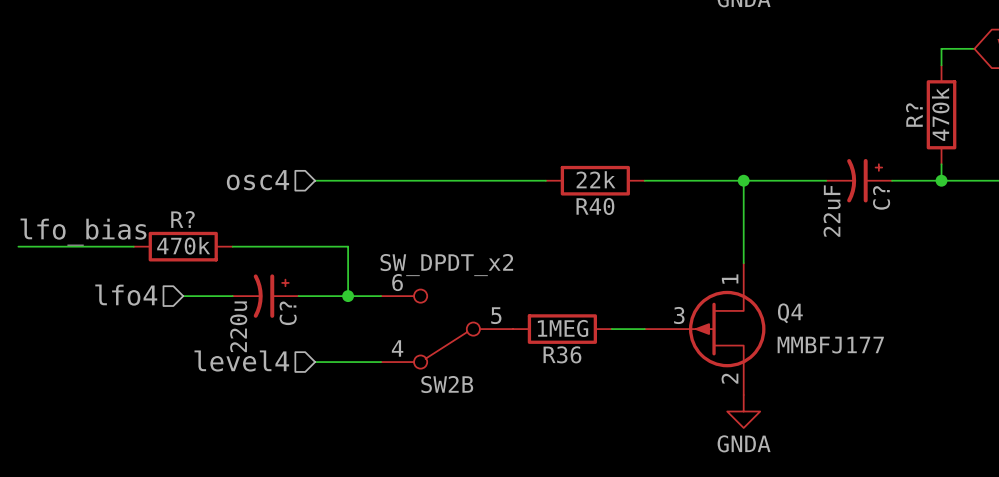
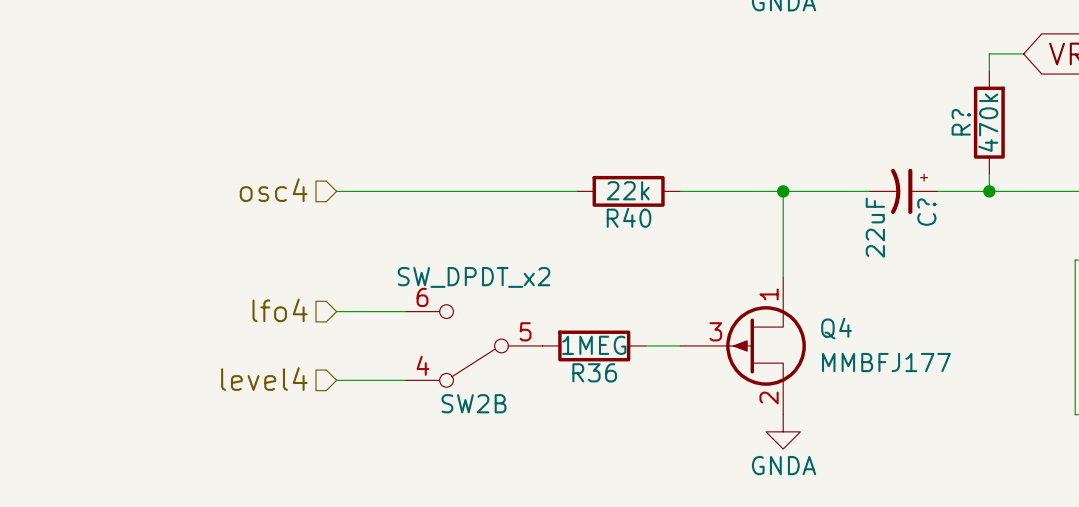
label: lfo_bias (83, 232) -> none
wire: (18, 246) (133, 246) -> none
R?: 470k (183, 246) -> none
wire: (232, 246) (348, 246) (348, 296) -> none
hierarchical label position: lfo4 (126, 295) -> lfo4 (280, 310)
wire: (183, 296) (232, 296) -> none
C?: 220u (265, 296) -> none
wire: (298, 296) (315, 296) -> none
junction: (348, 296) -> none

